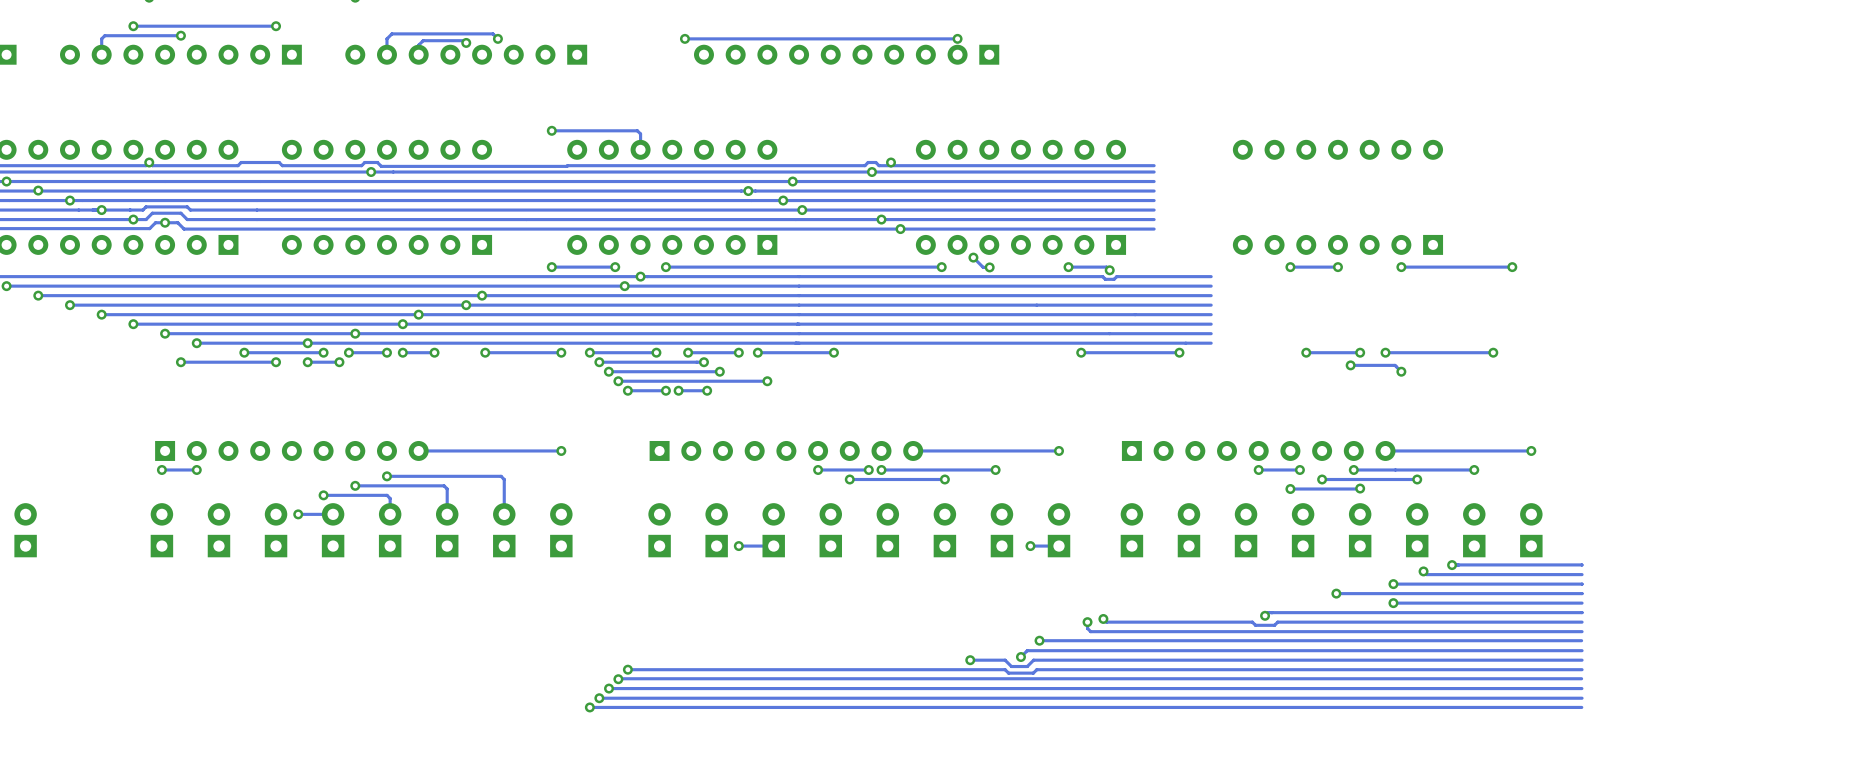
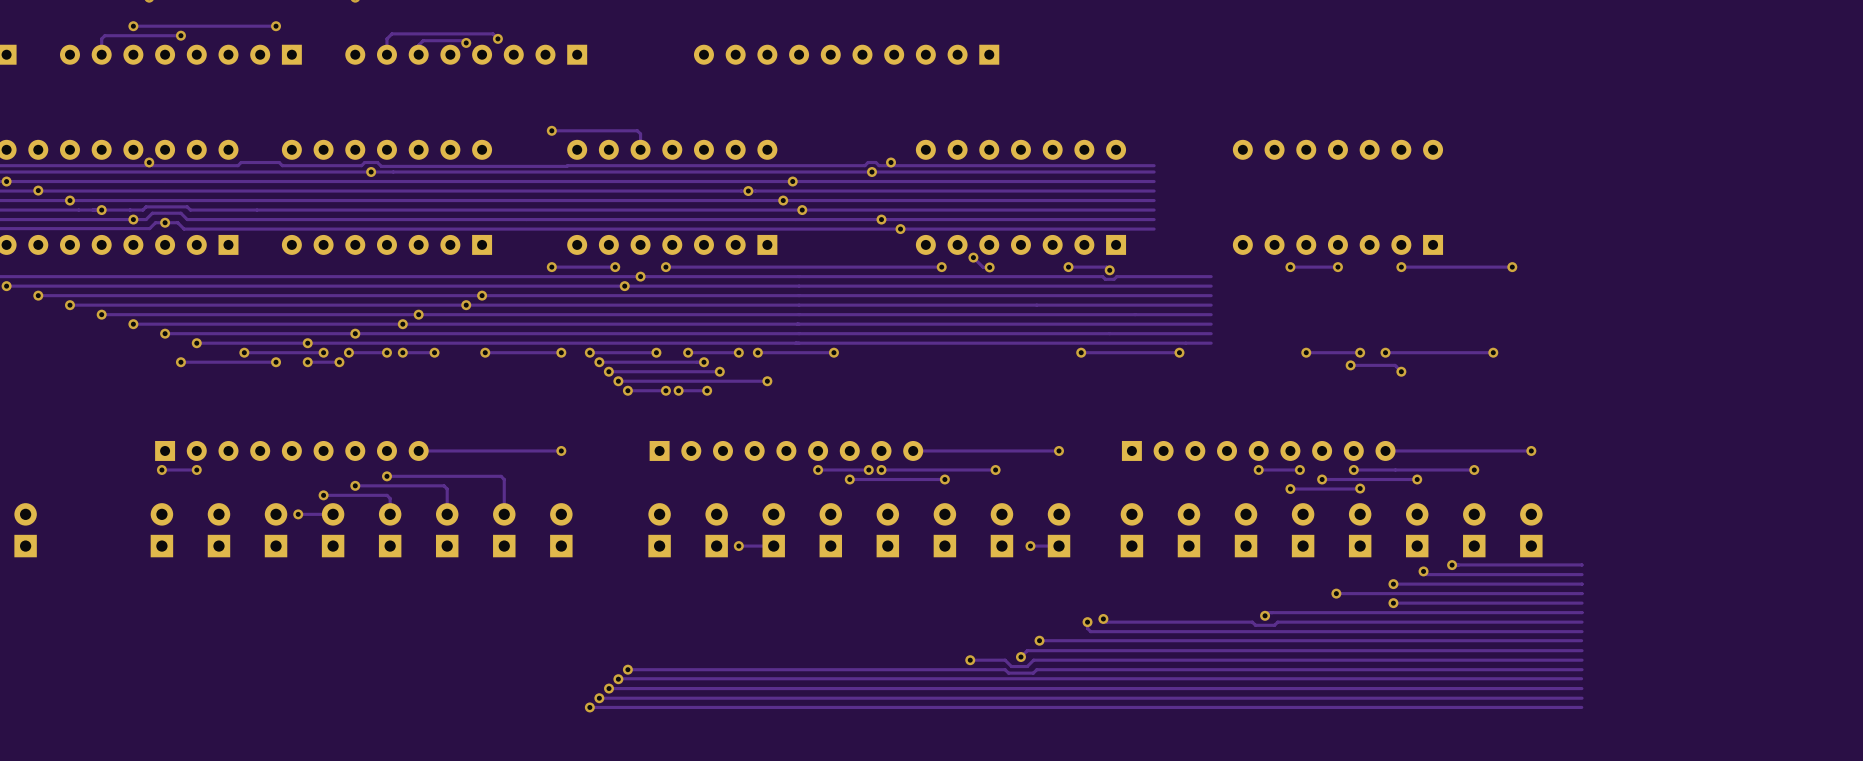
via: (684, 38) -> none
track: (957, 38) (684, 38) -> none
via: (957, 38) -> none

